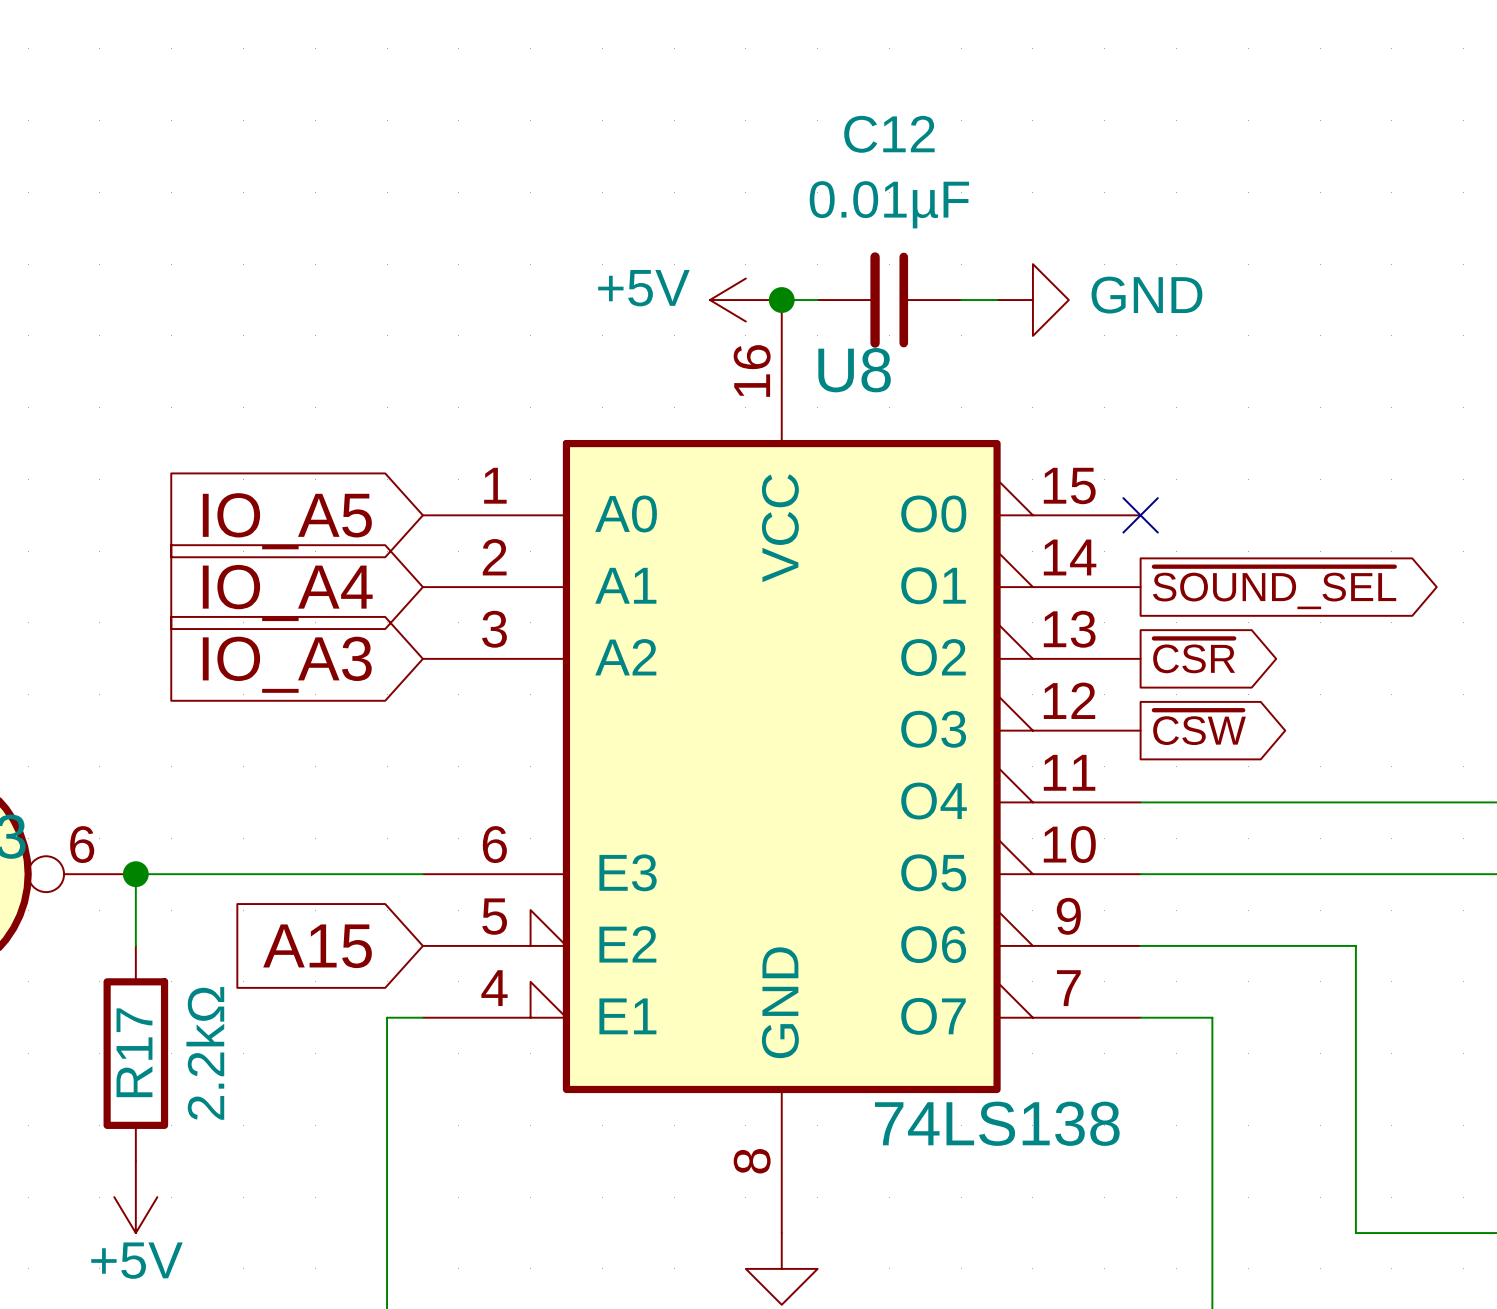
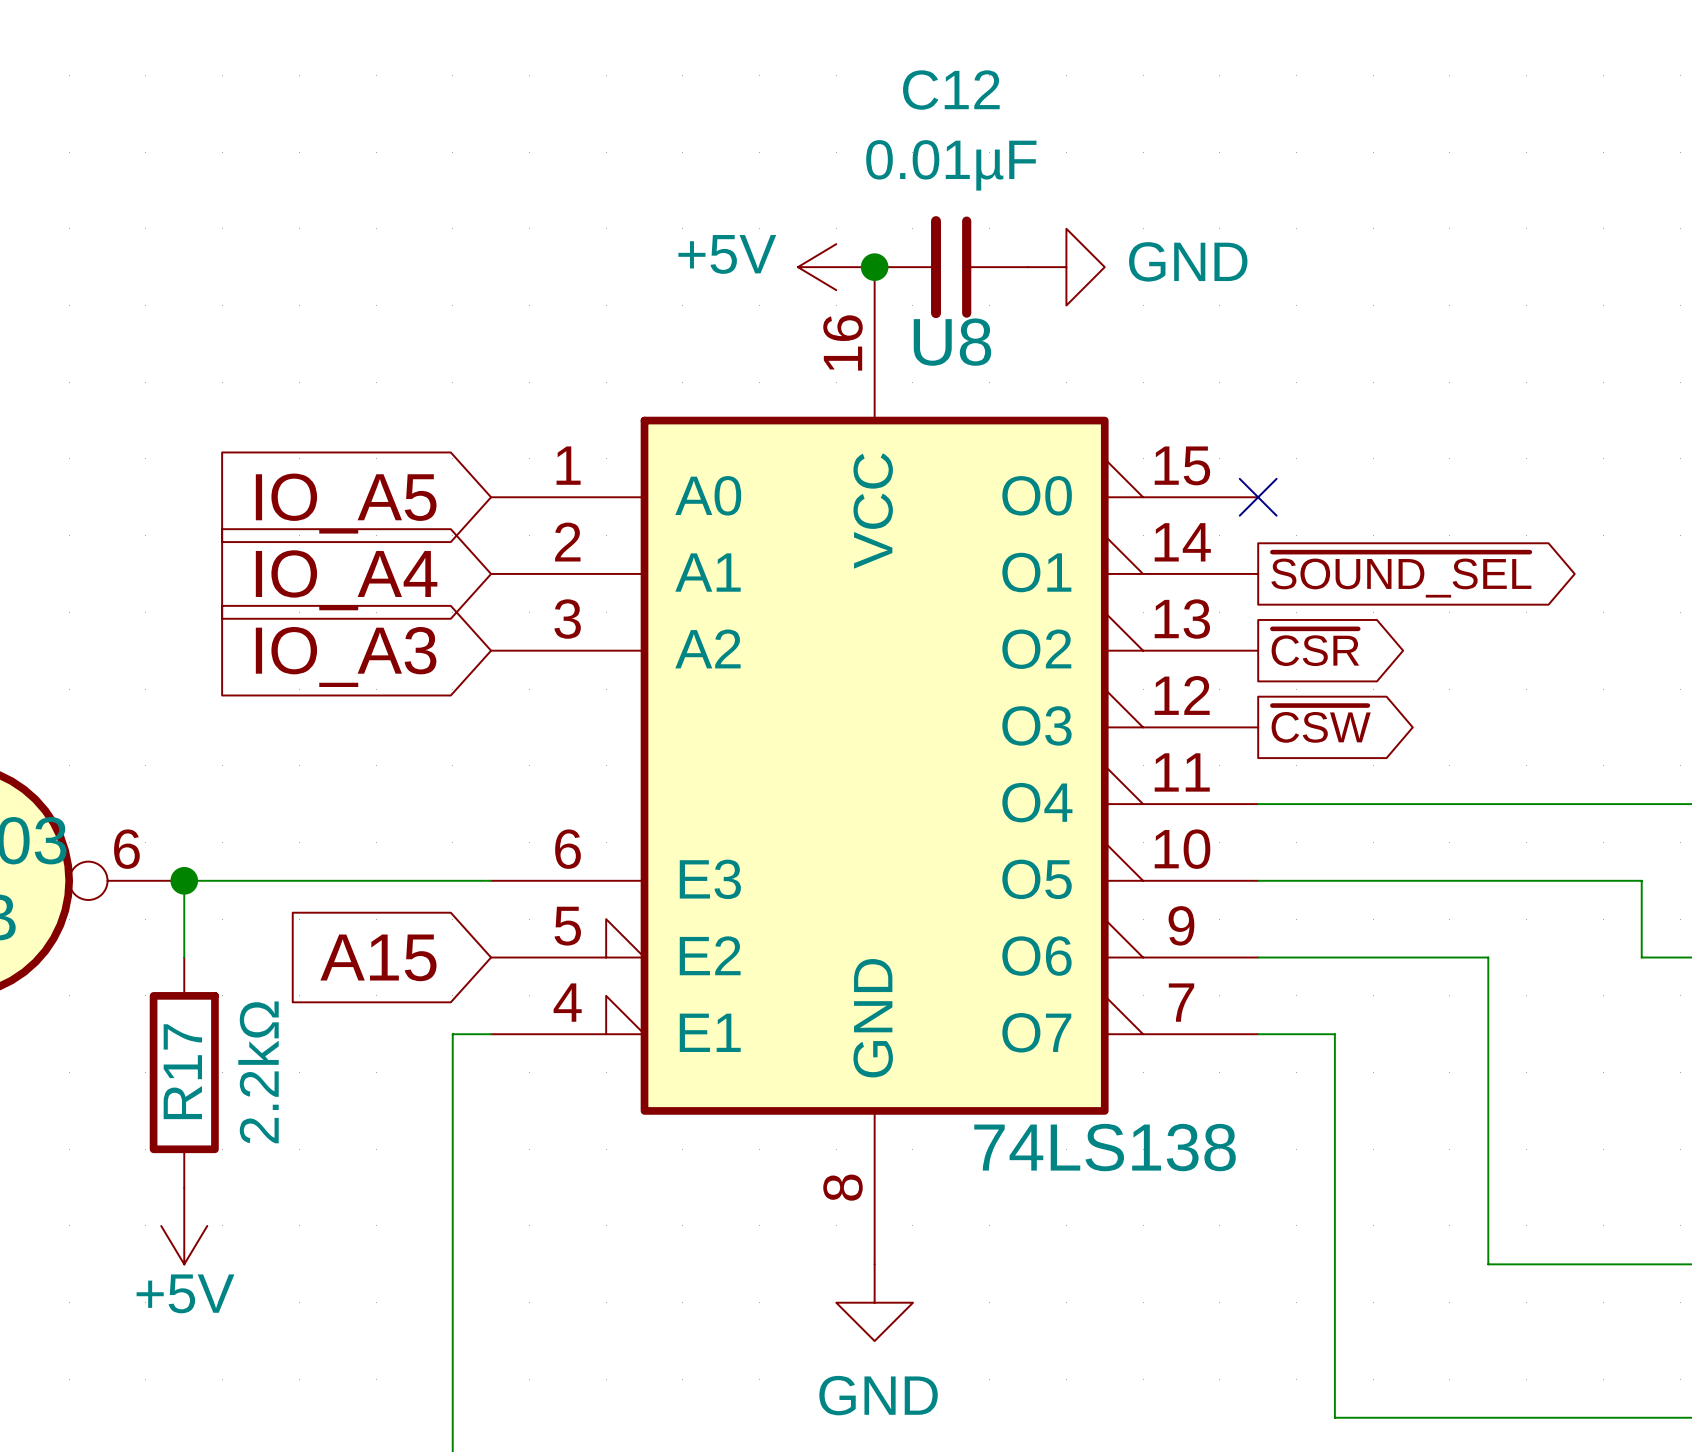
C12 position: (889, 300) -> (951, 267)
wire: (961, 300) (997, 300) -> none
power symbol position: GND (1032, 300) -> GND (1066, 267)

